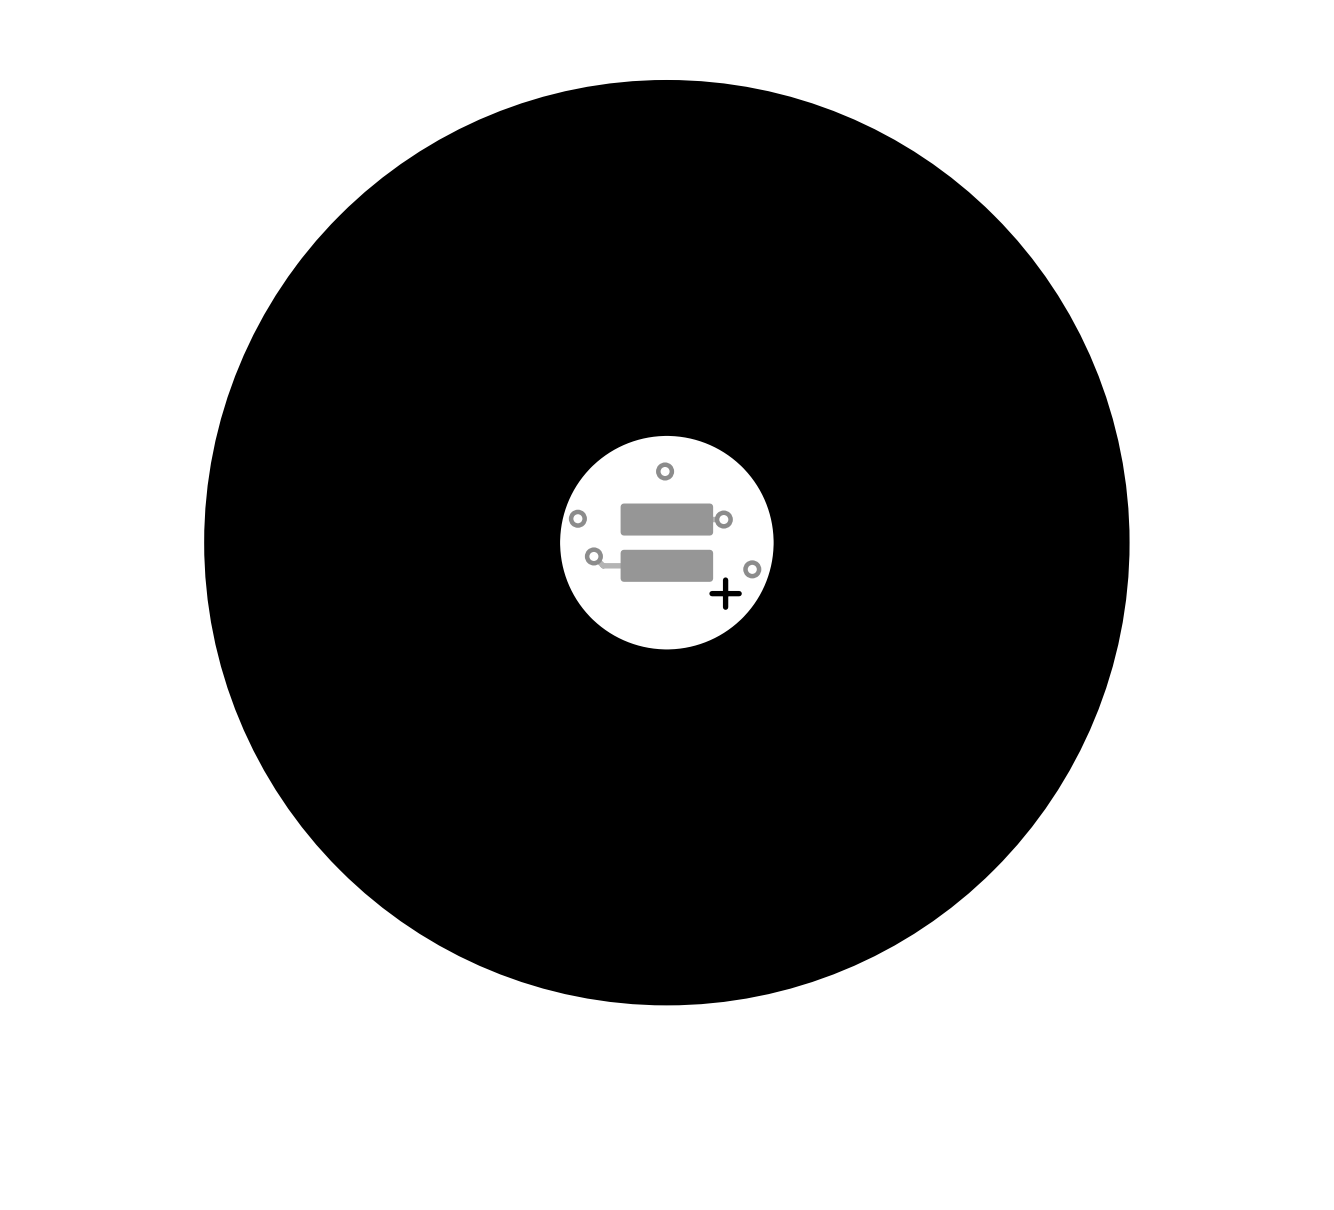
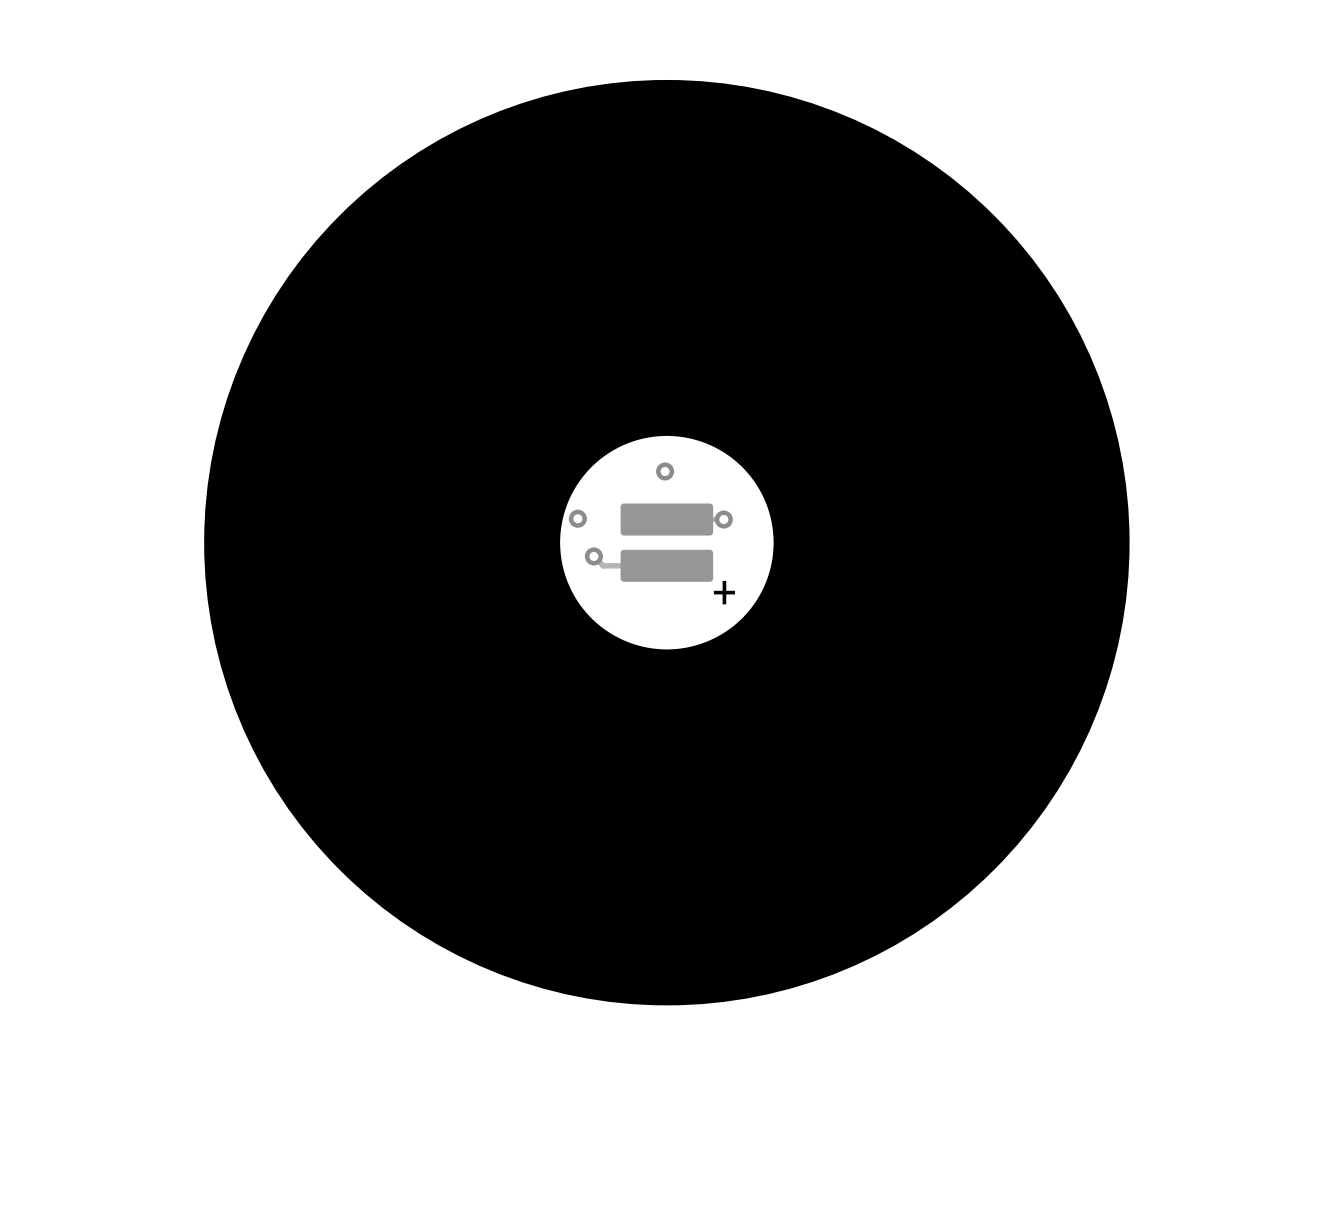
via: (752, 569) -> none

